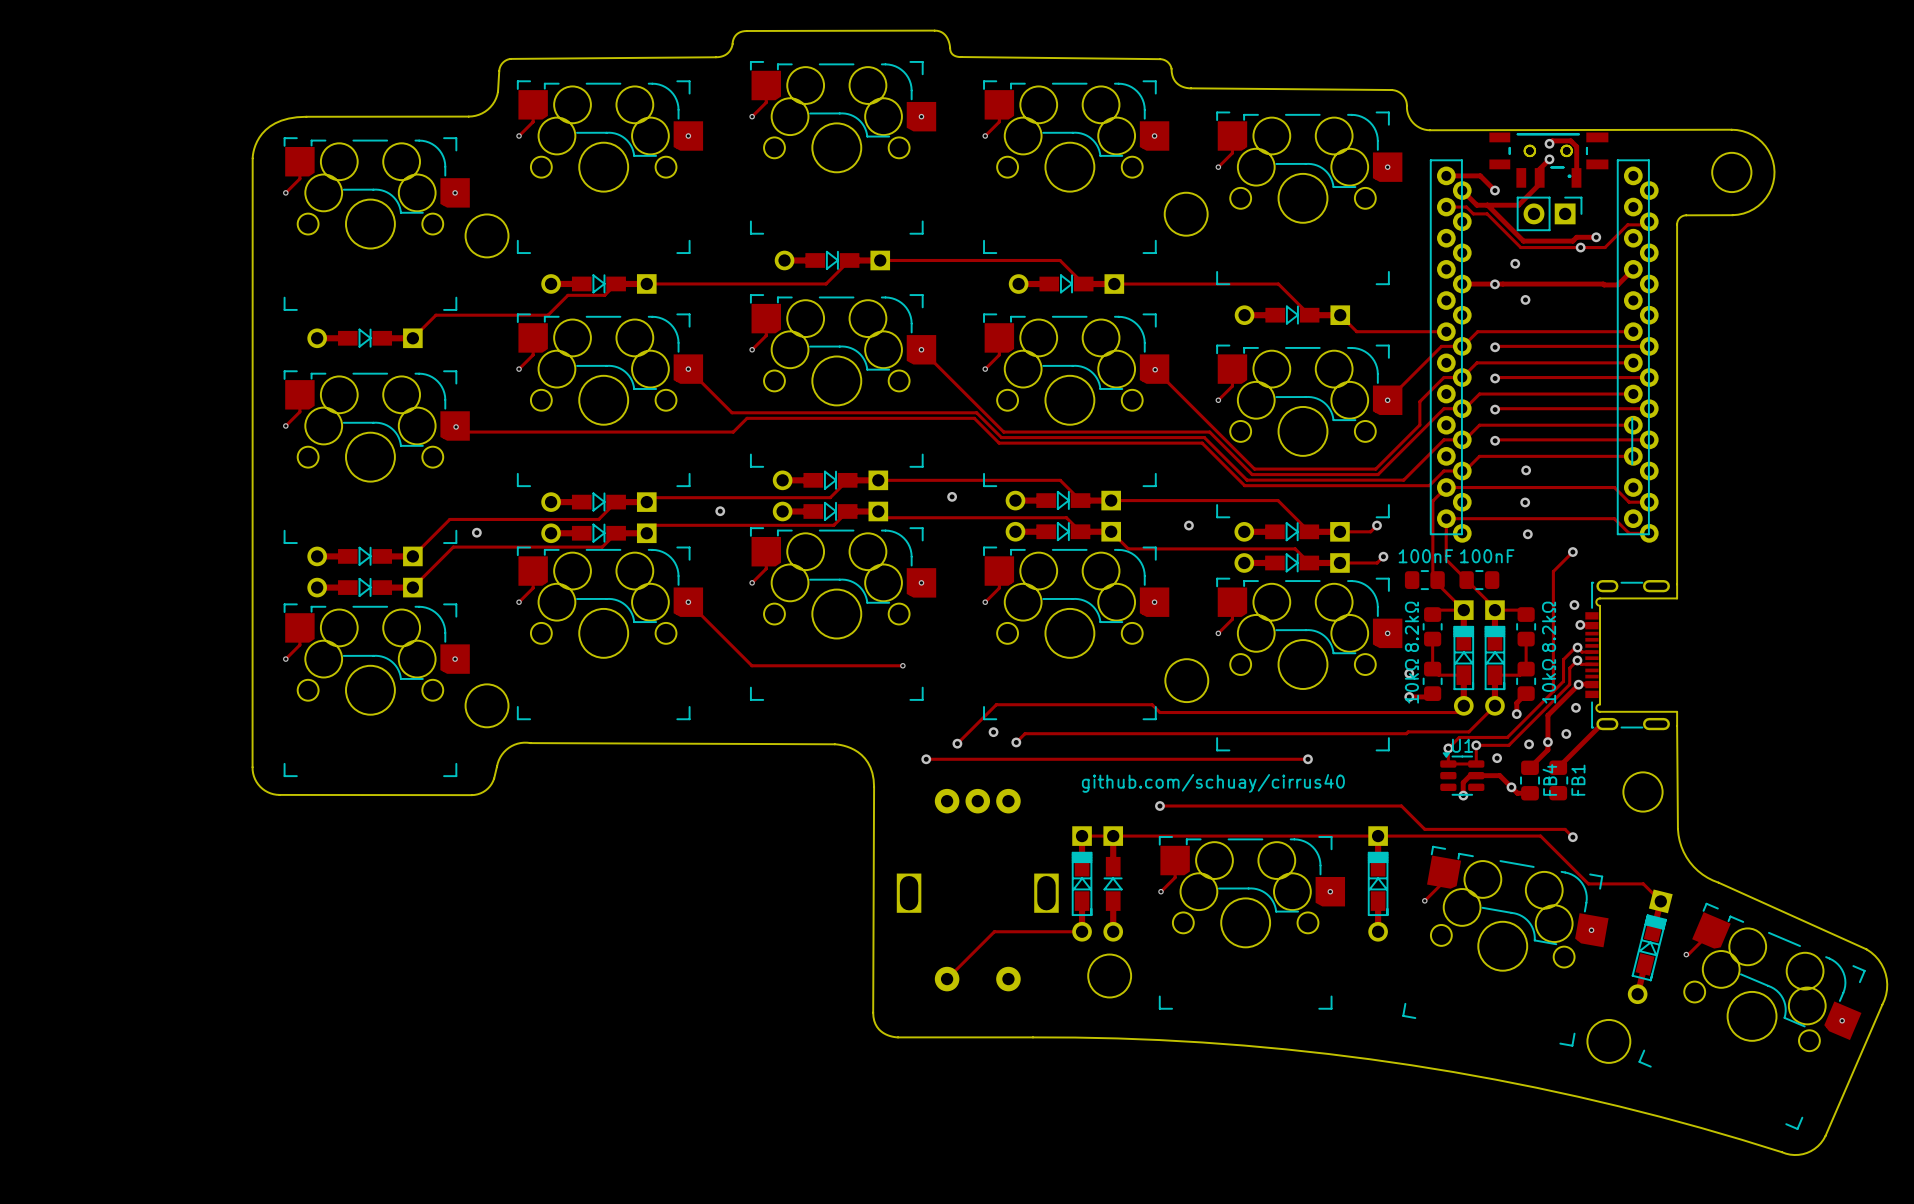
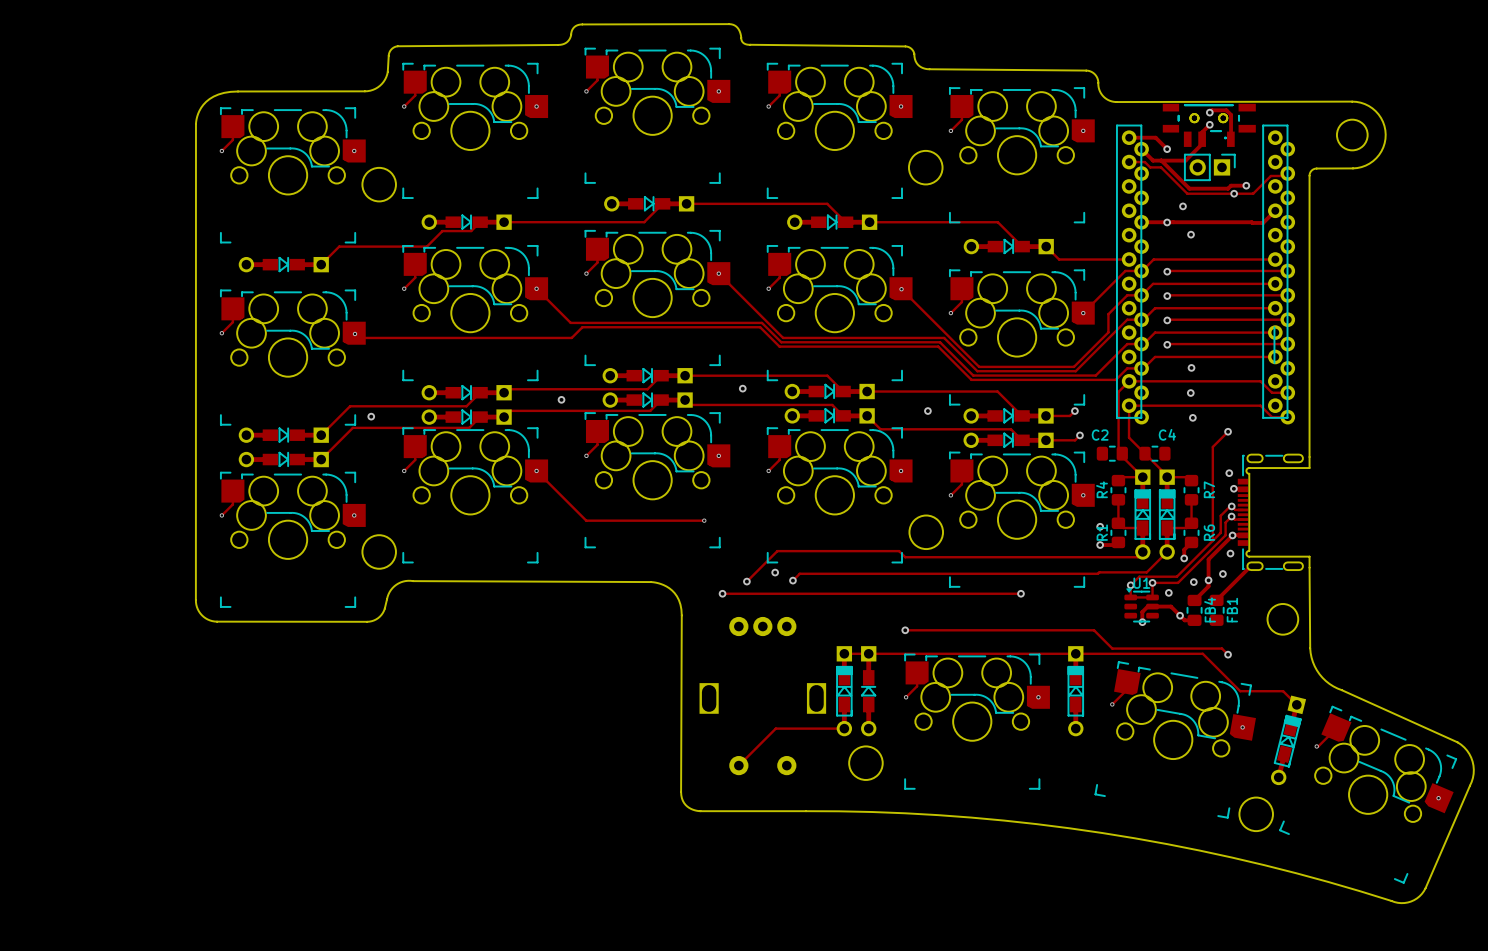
100nF name: 100nF (1425, 556) -> C2 (1100, 435)
100nF name: 100nF (1487, 556) -> C4 (1167, 434)
8.2kΩ name: 8.2kΩ (1411, 626) -> R4 (1102, 489)
8.2kΩ name: 8.2kΩ (1549, 626) -> R7 (1209, 489)
10kΩ name: 10kΩ (1411, 681) -> R1 (1102, 532)
10kΩ name: 10kΩ (1549, 681) -> R6 (1209, 532)
text: github.com/schuay/cirrus40 (1213, 783) -> none

